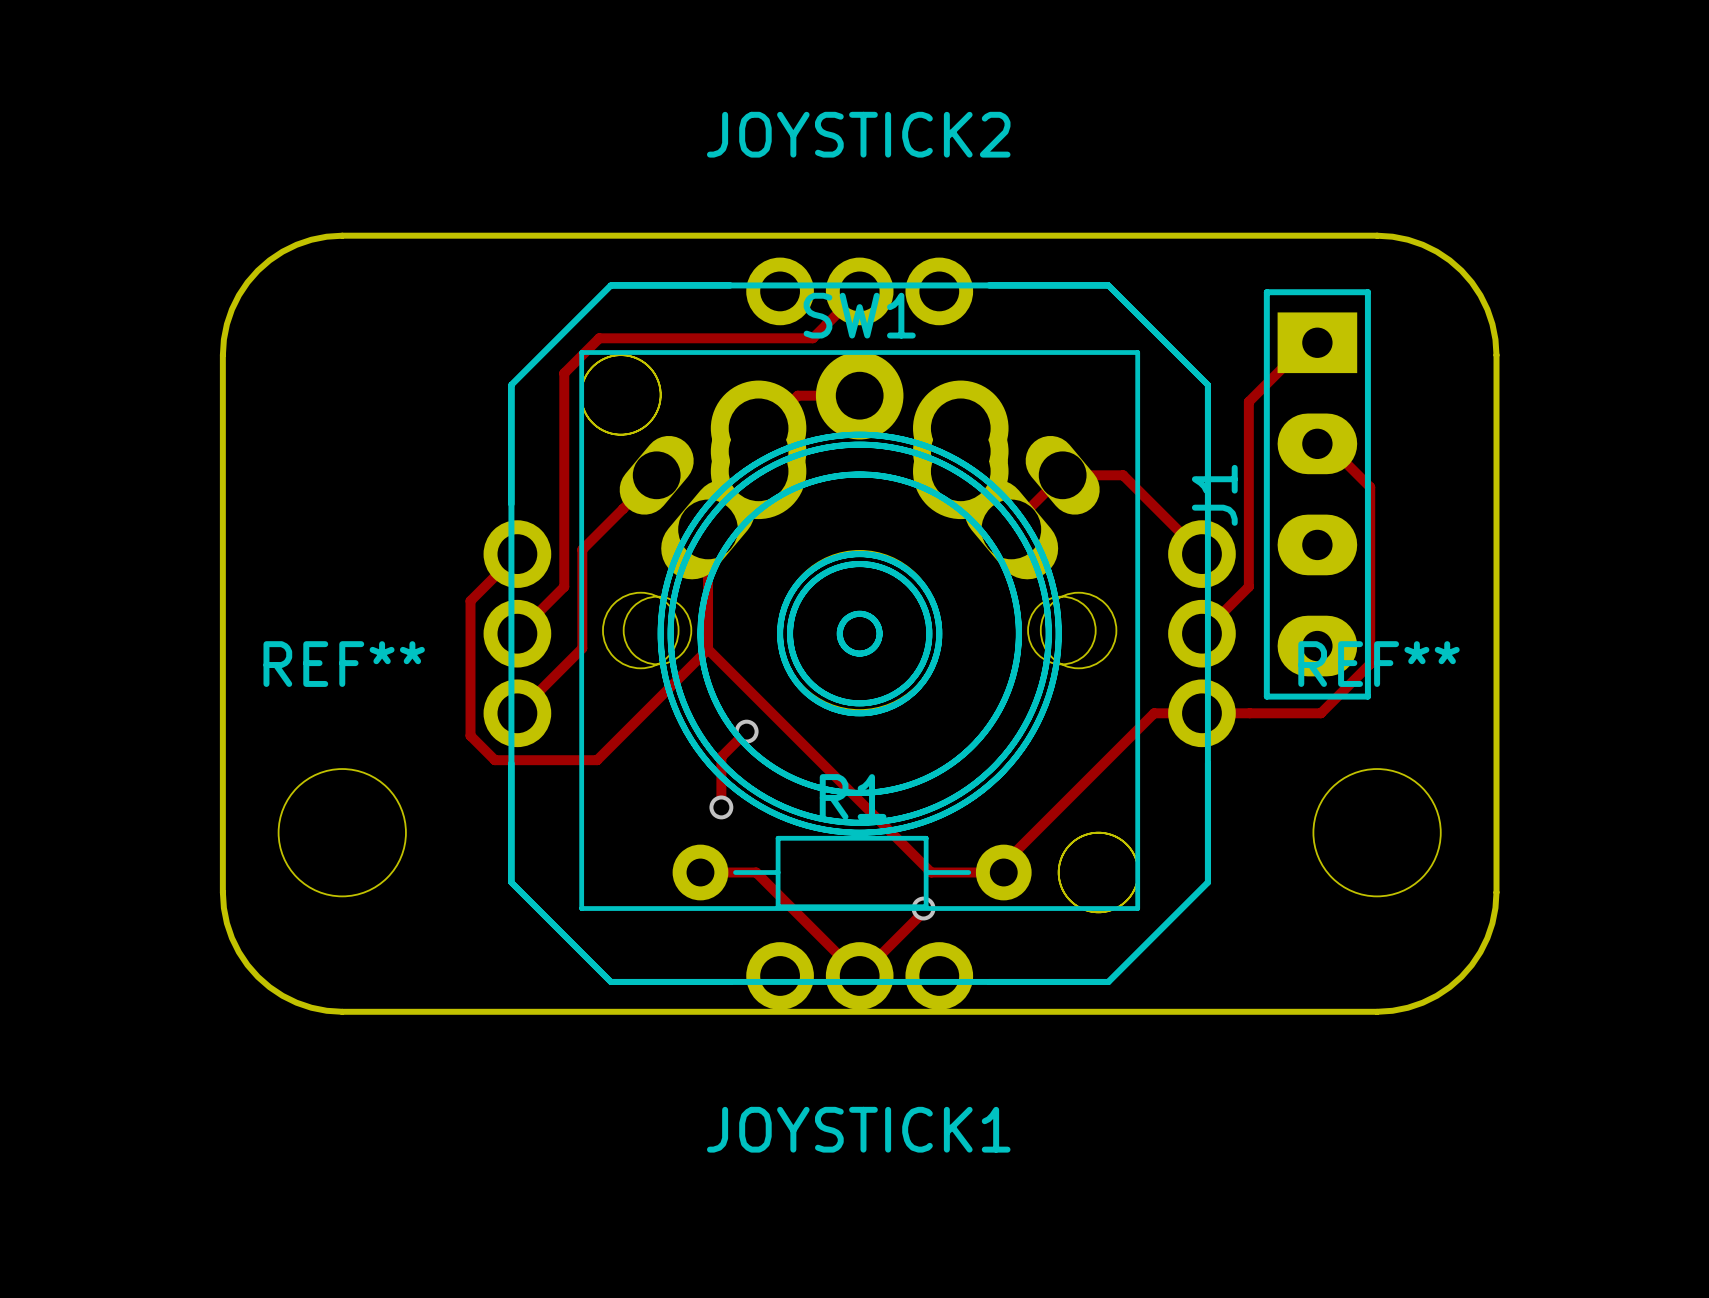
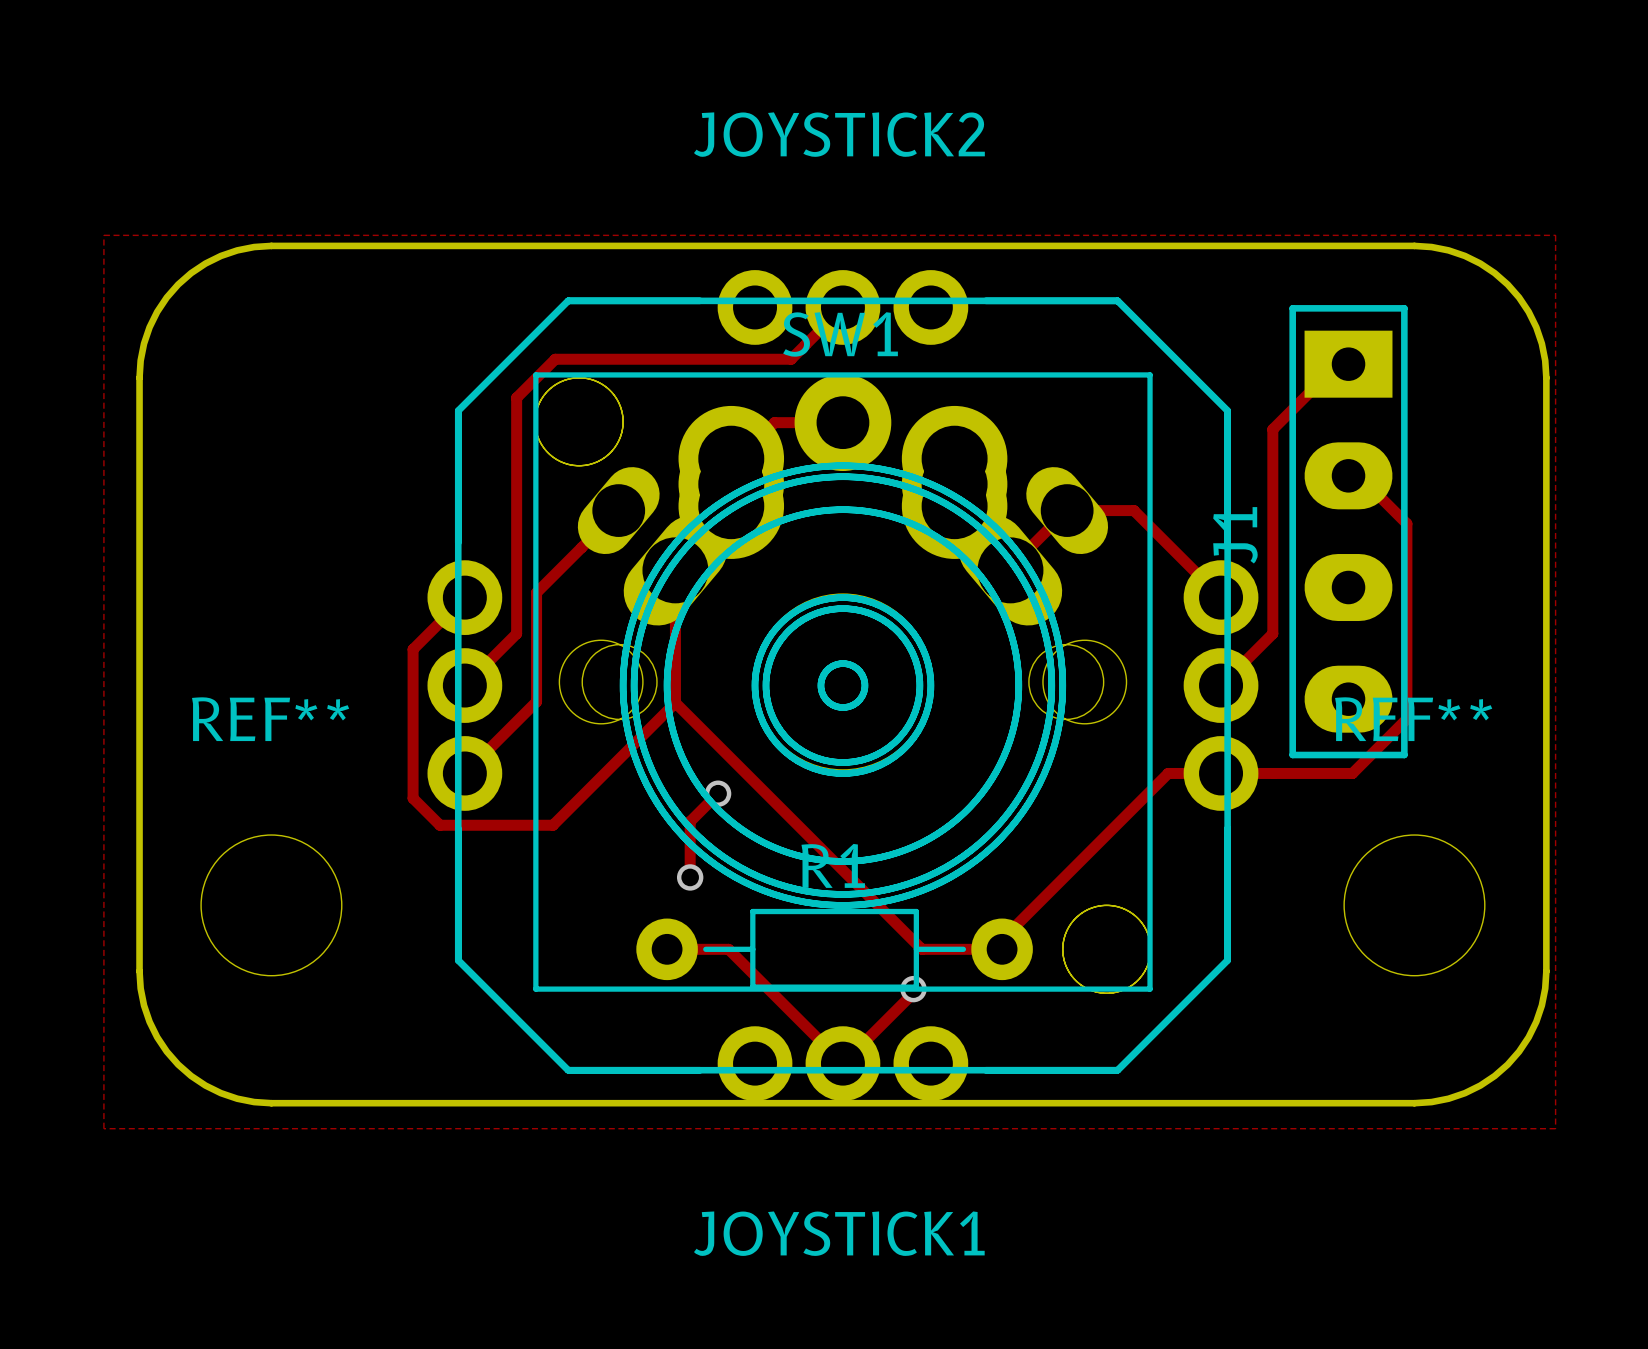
zone outline: none -> (103, 235) (103, 1128) (1555, 1128) (1555, 235) (103, 235)

